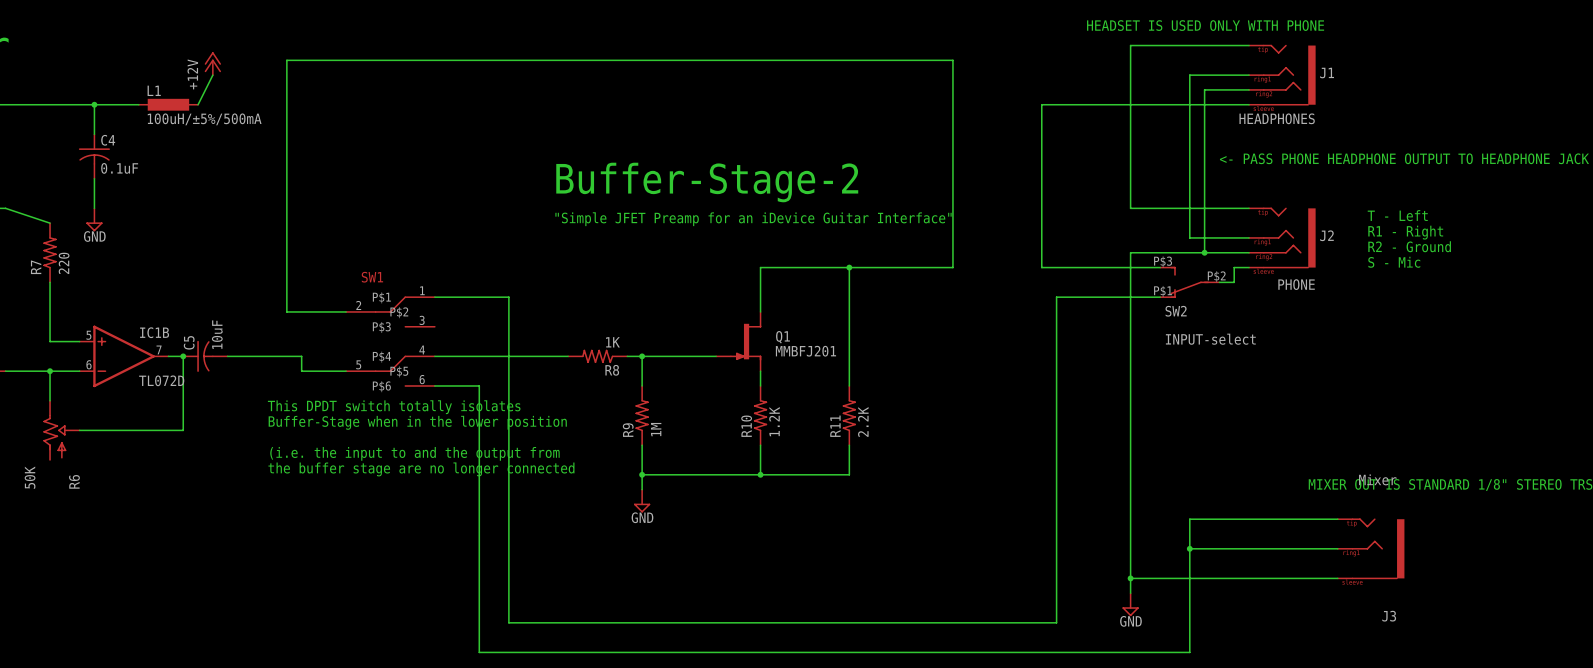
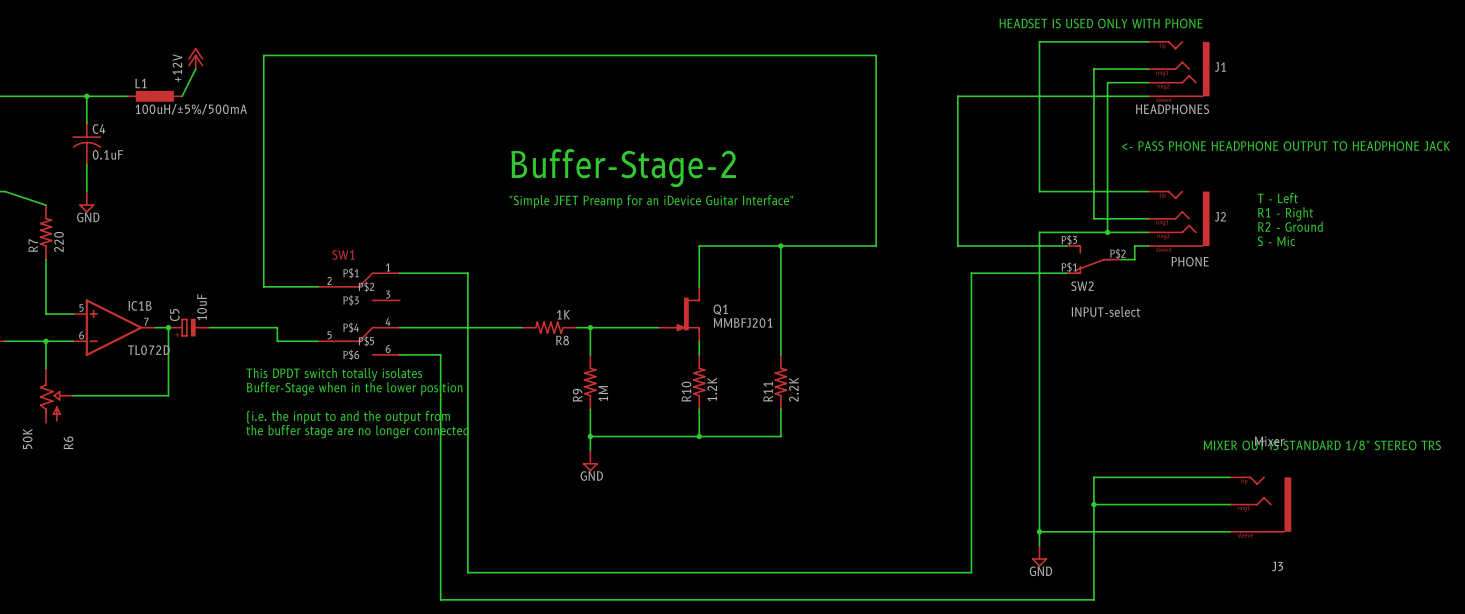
C5 symbol: [183, 340, 228, 372] -> [168, 318, 210, 337]

